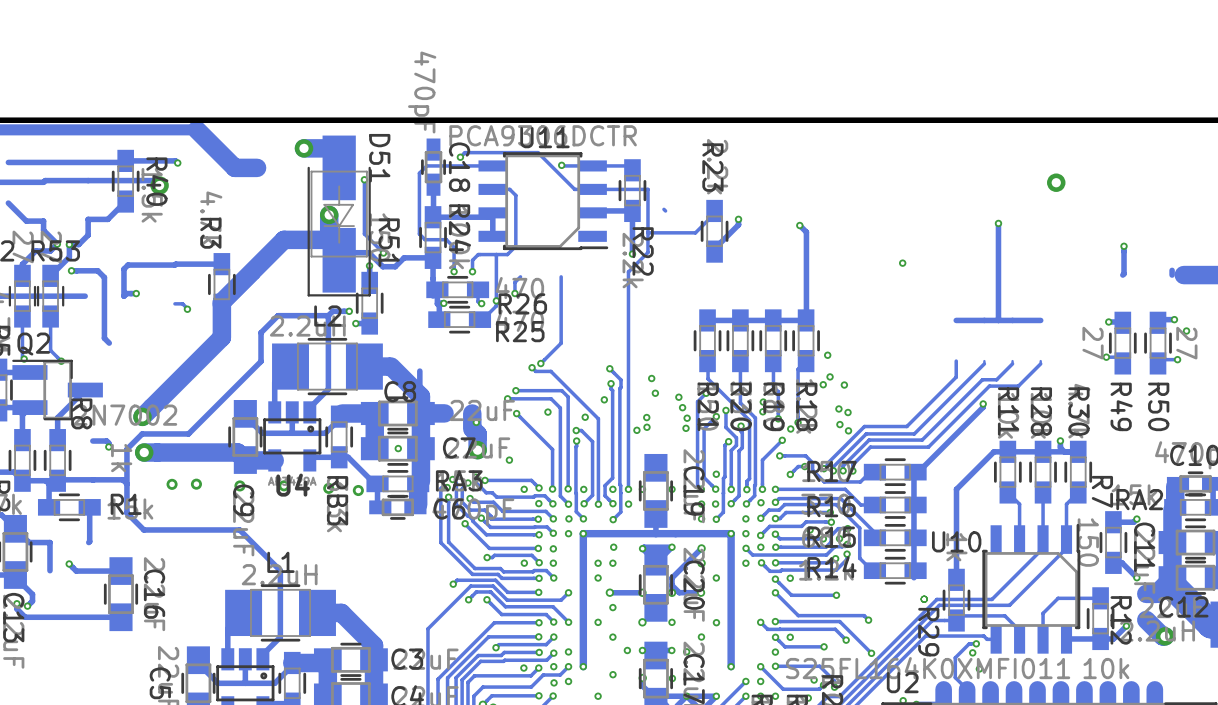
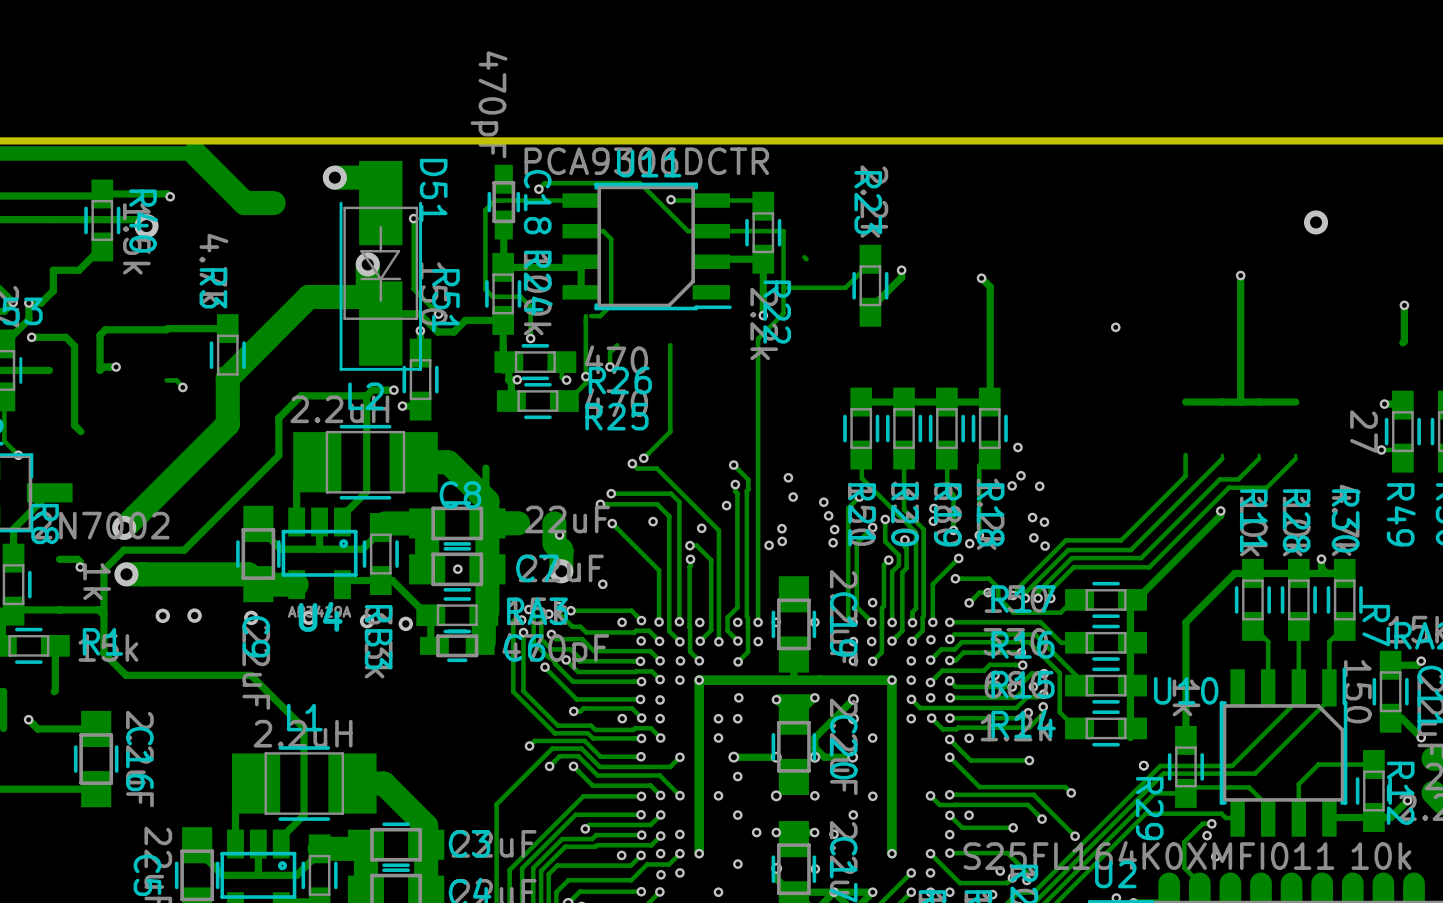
track: (500, 254) (478, 254) (472, 260) (472, 271) -> none
via: (472, 271) -> none

